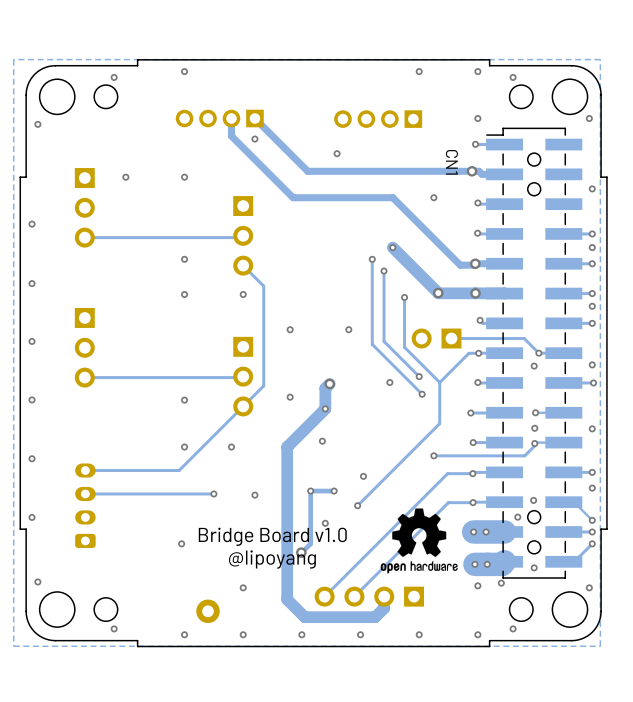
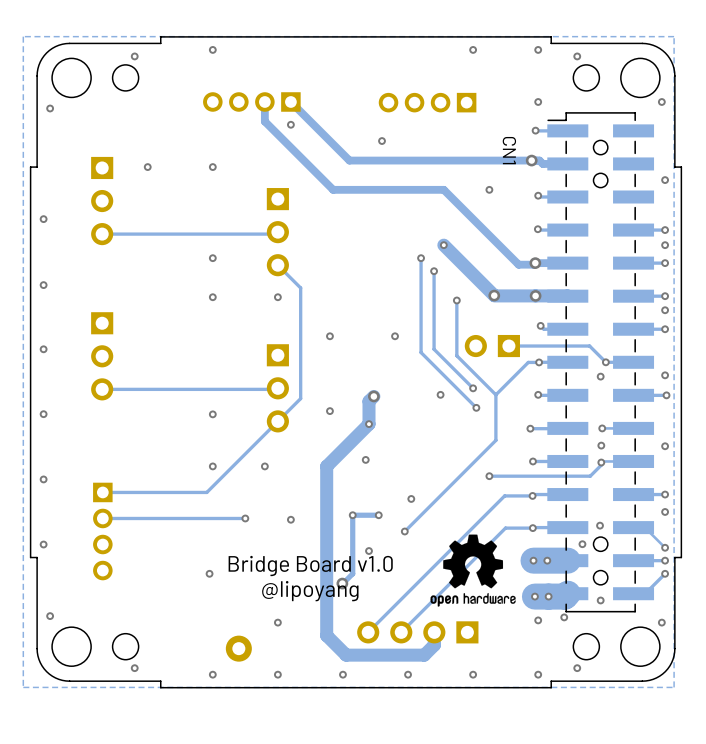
part footprint: [75, 463, 96, 548] -> [93, 482, 113, 581]

